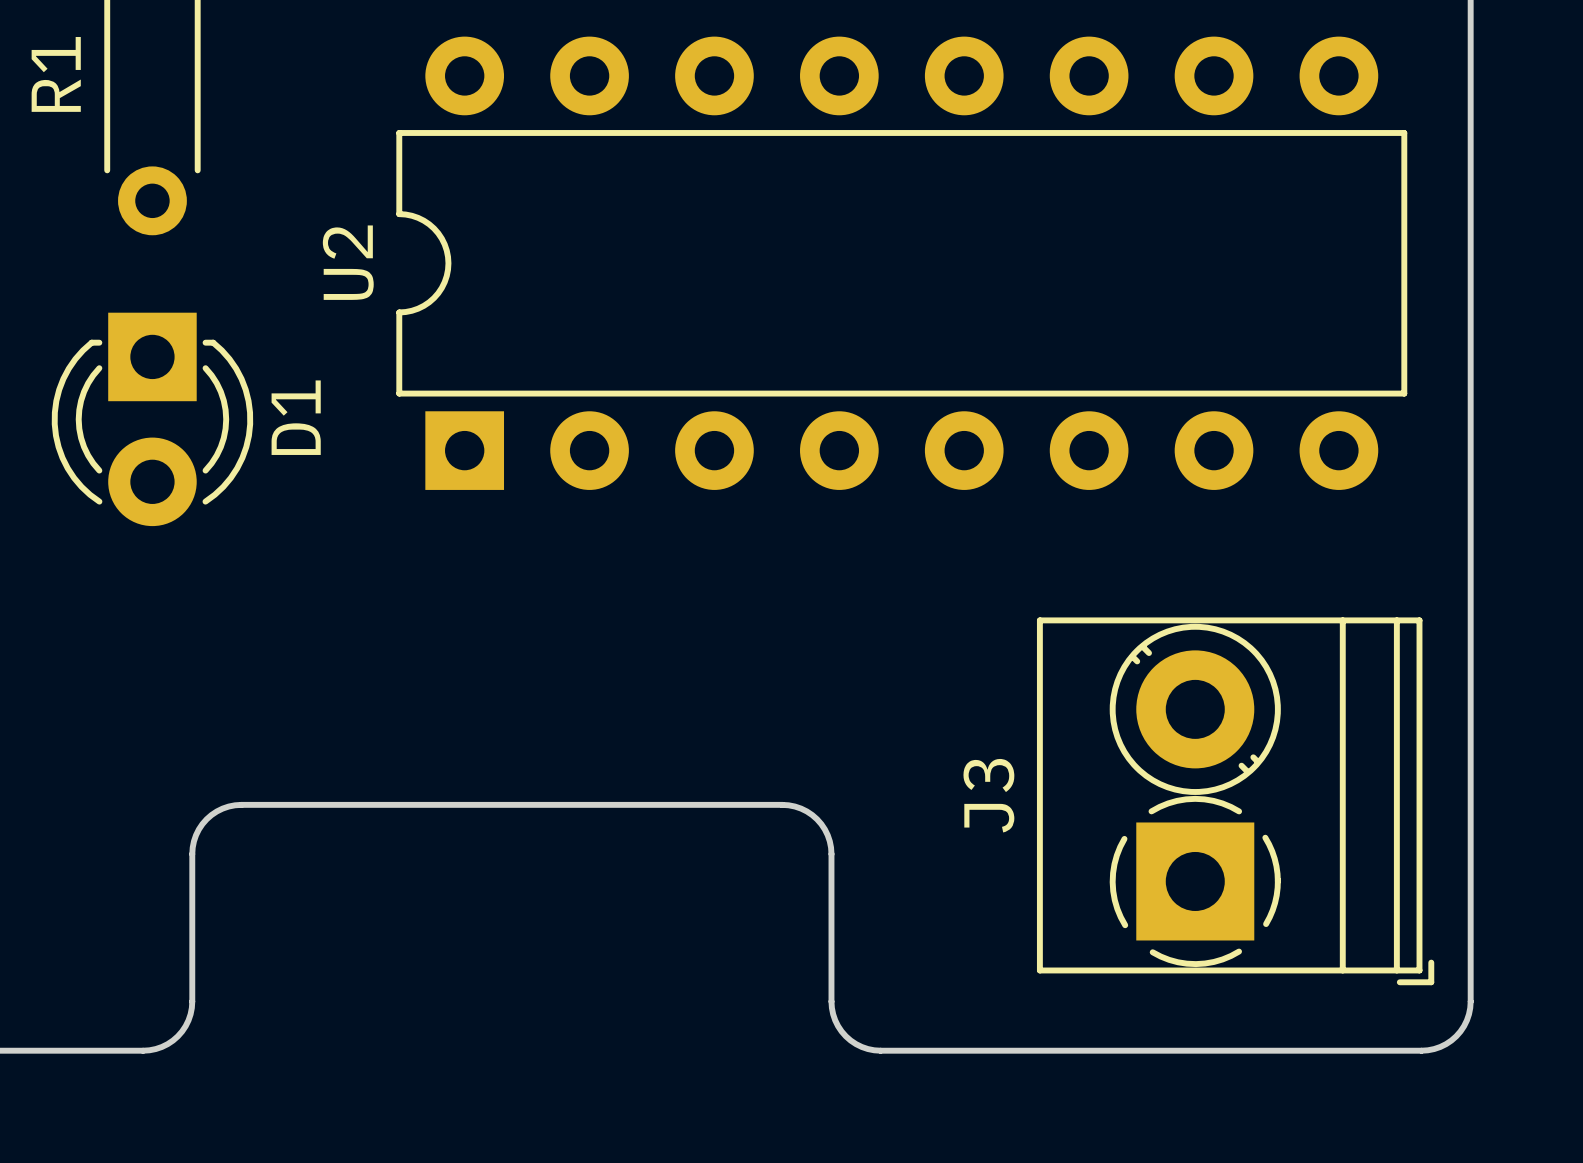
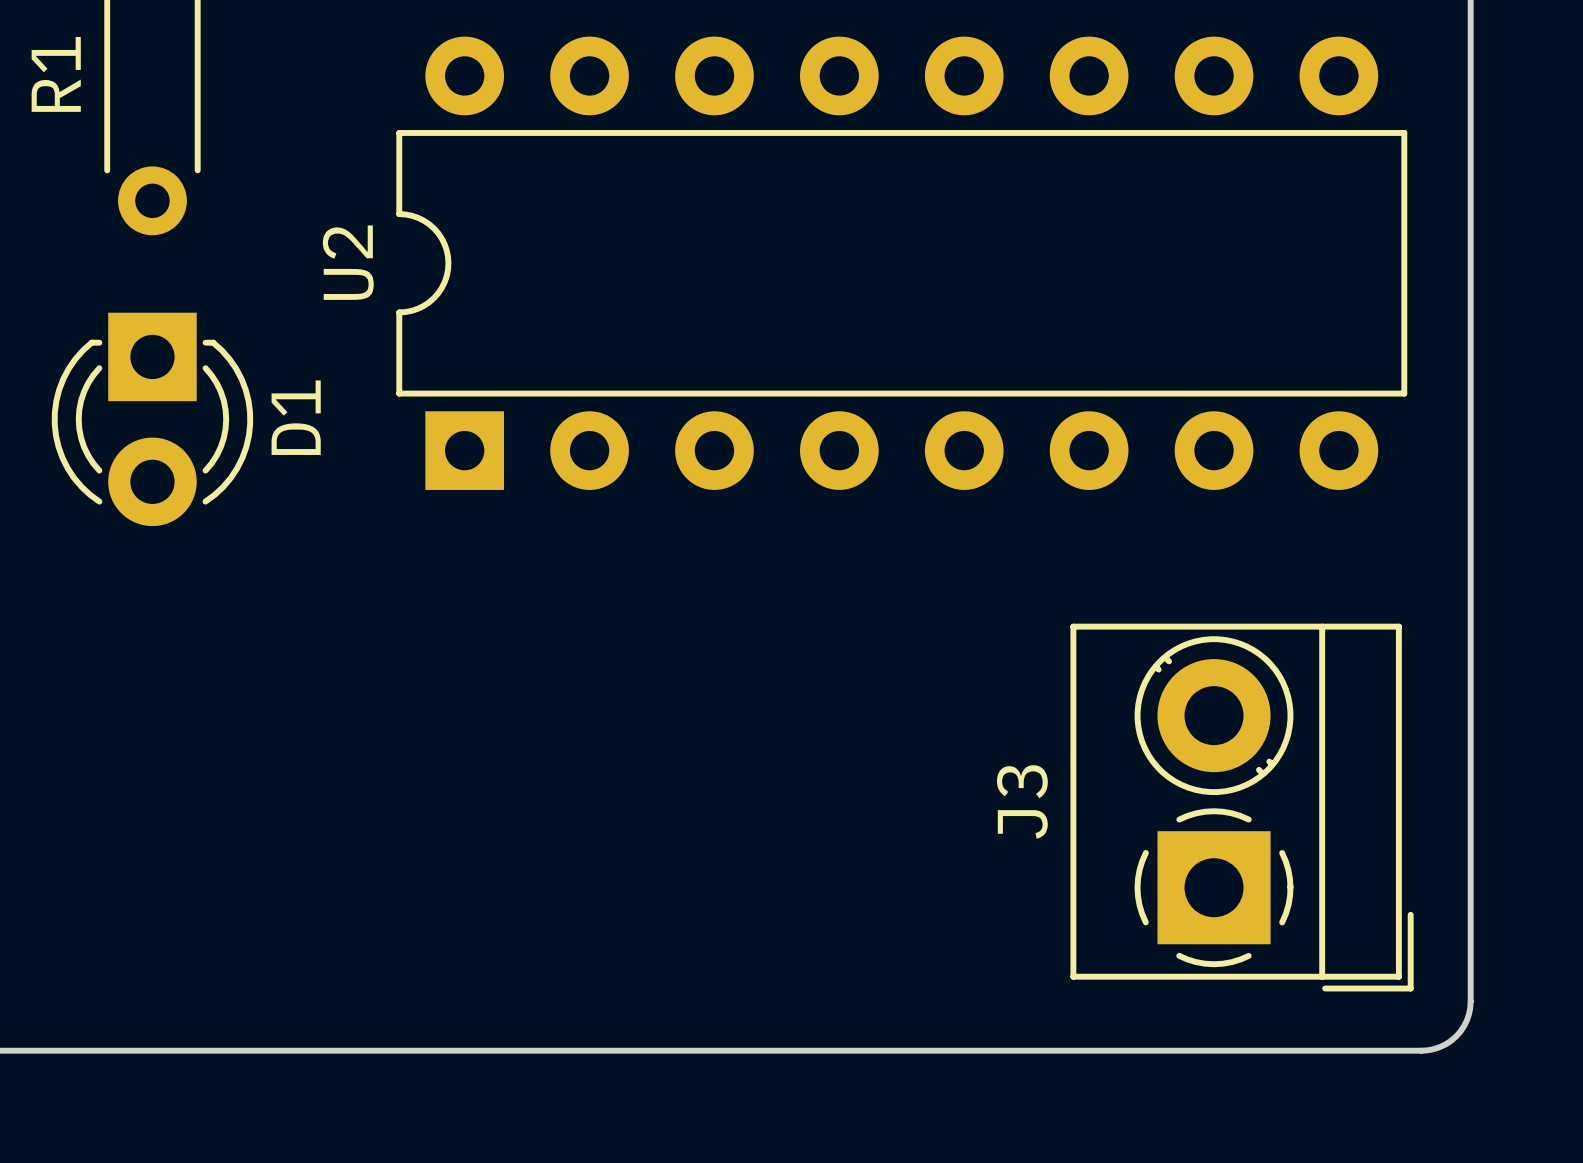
J3 footprint: [1036, 617, 1435, 986] -> [1070, 623, 1414, 992]
J3 name position: J3 (988, 795) -> J3 (1022, 801)
board edge: (143, 1050) (155, 1049) (173, 1040) (182, 1031) (188, 1020) (192, 1001) (192, 854) (193, 841) (202, 824) (211, 815) (228, 806) (241, 804) (782, 804) (801, 808) (812, 815) (821, 824) (827, 835) (831, 847) (831, 1001) (833, 1014) (841, 1031) (850, 1040) (867, 1049) (880, 1050) -> (143, 1050) (880, 1050)

